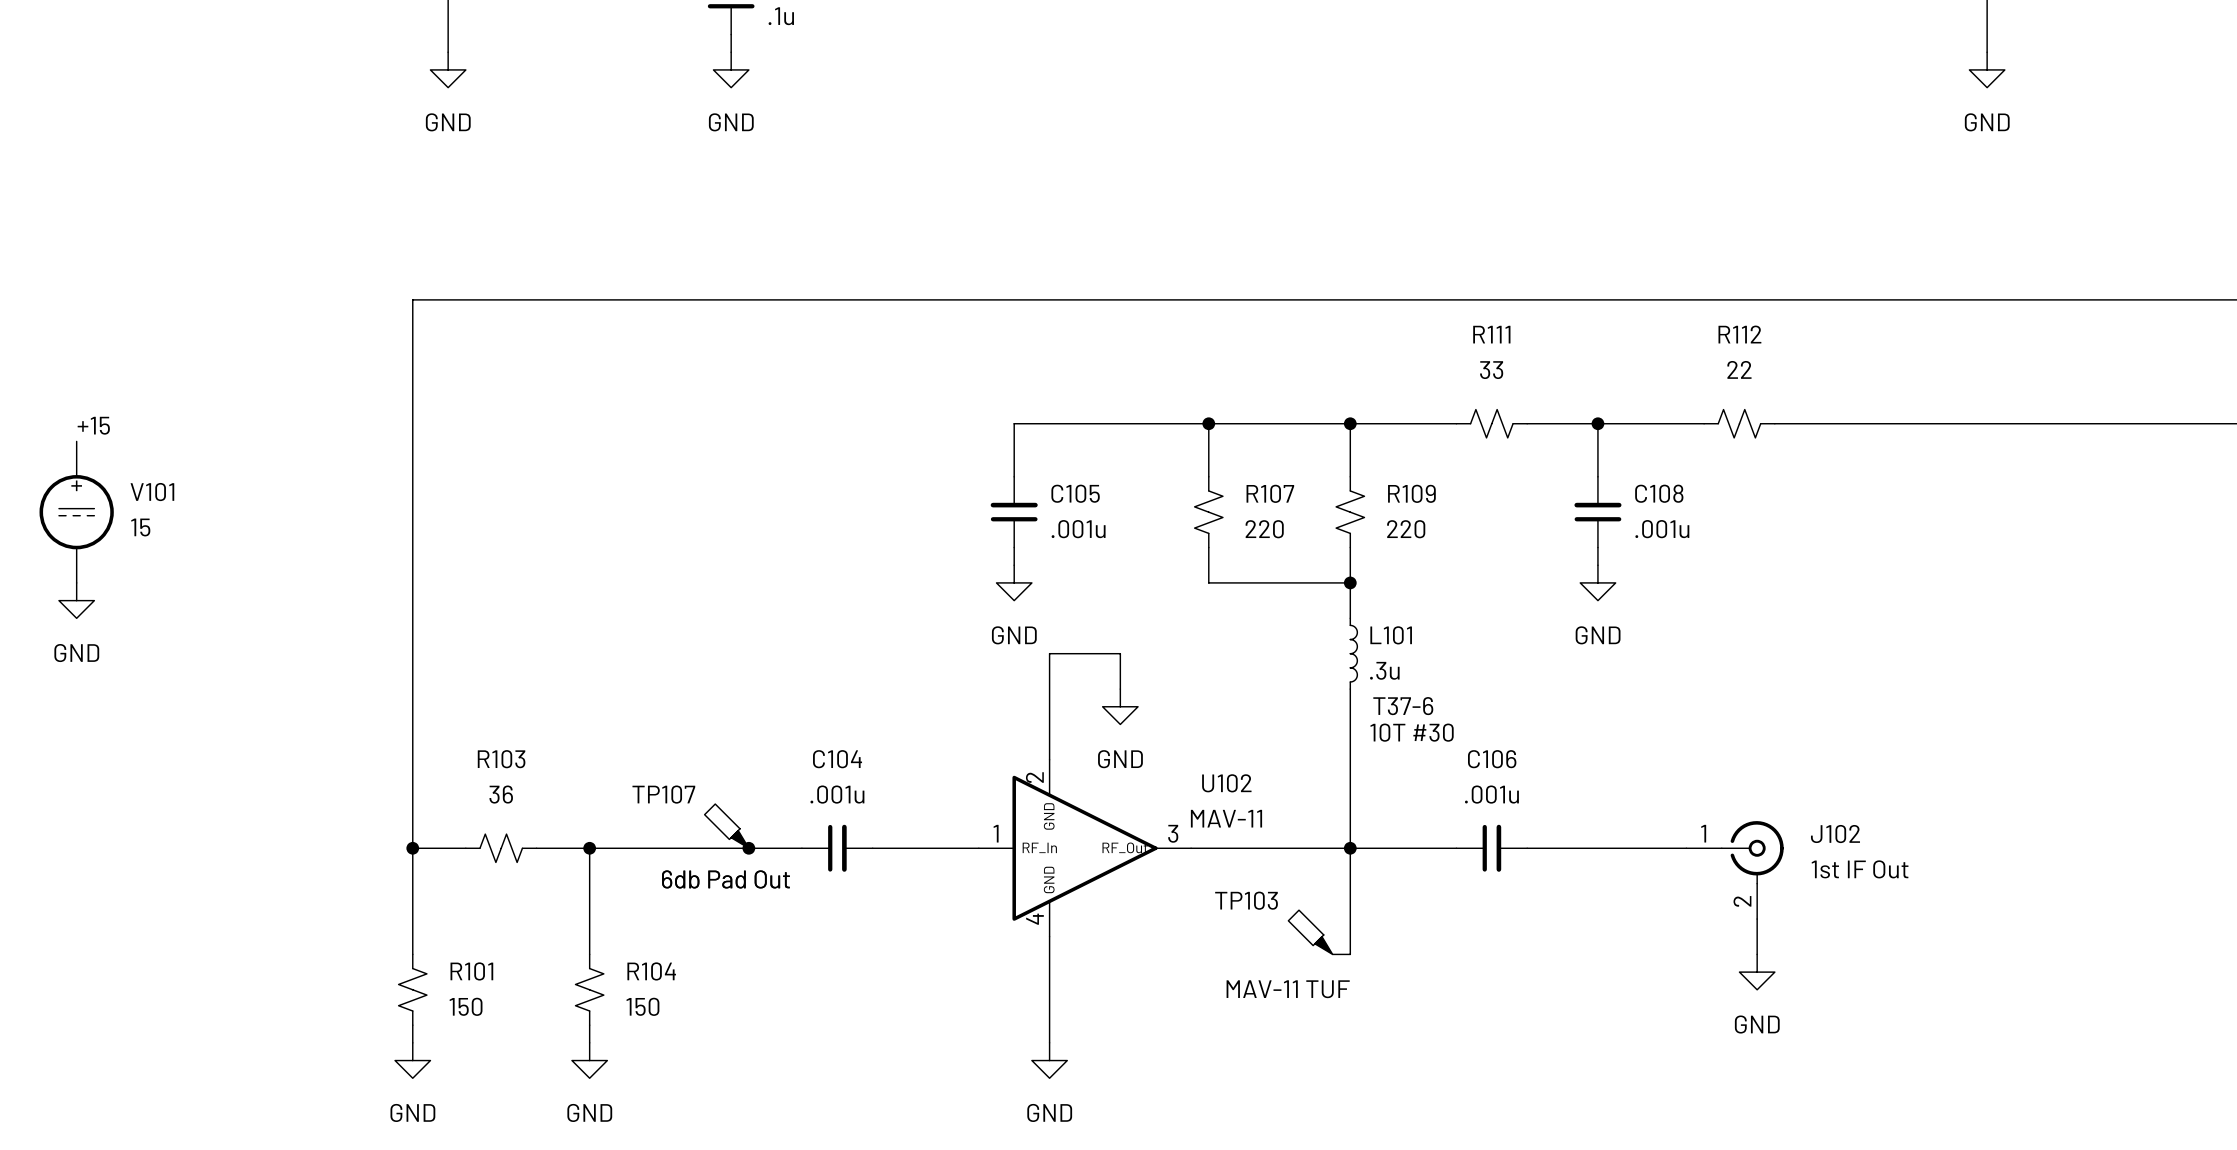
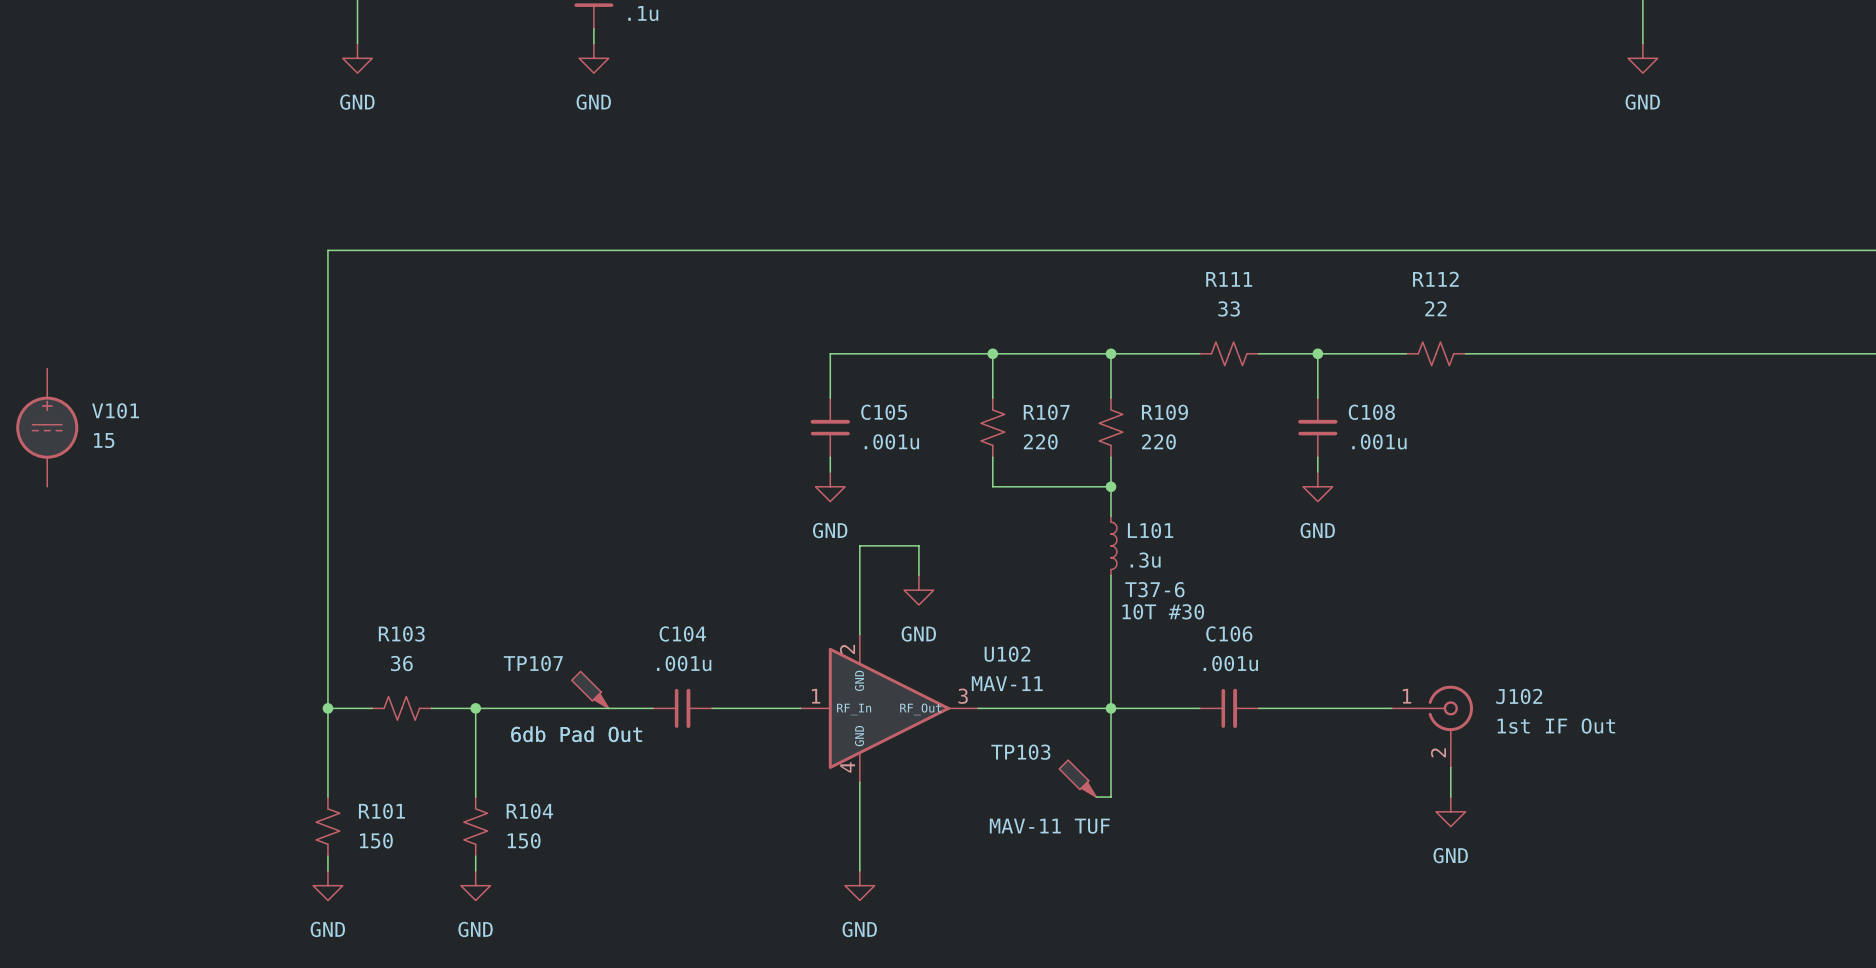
label: +15 (93, 425) -> none
power symbol: GND (76, 600) -> none
junction: (748, 848) -> none

